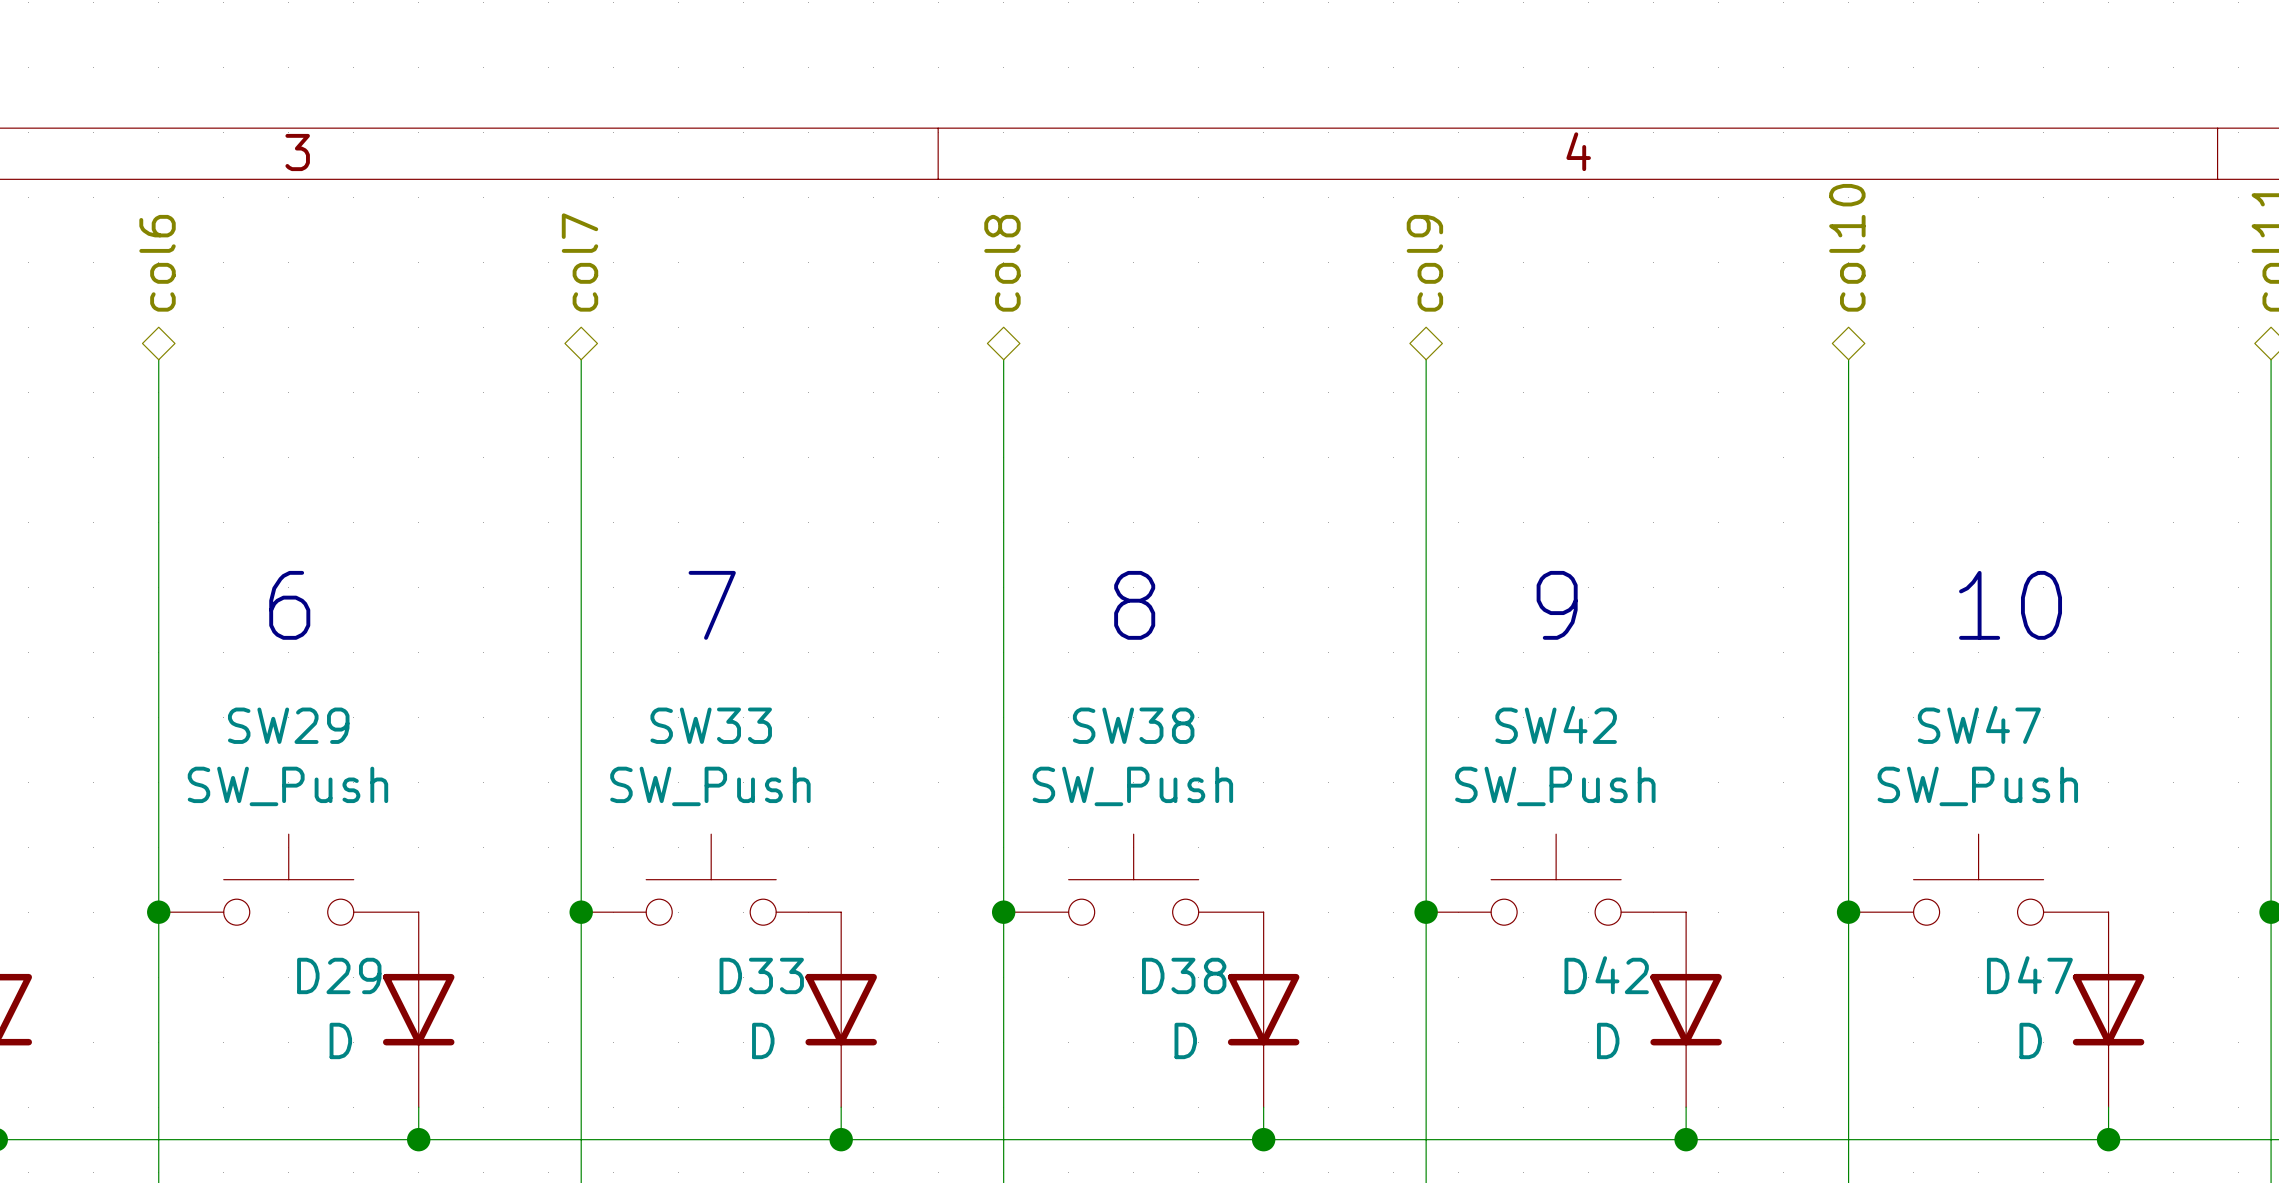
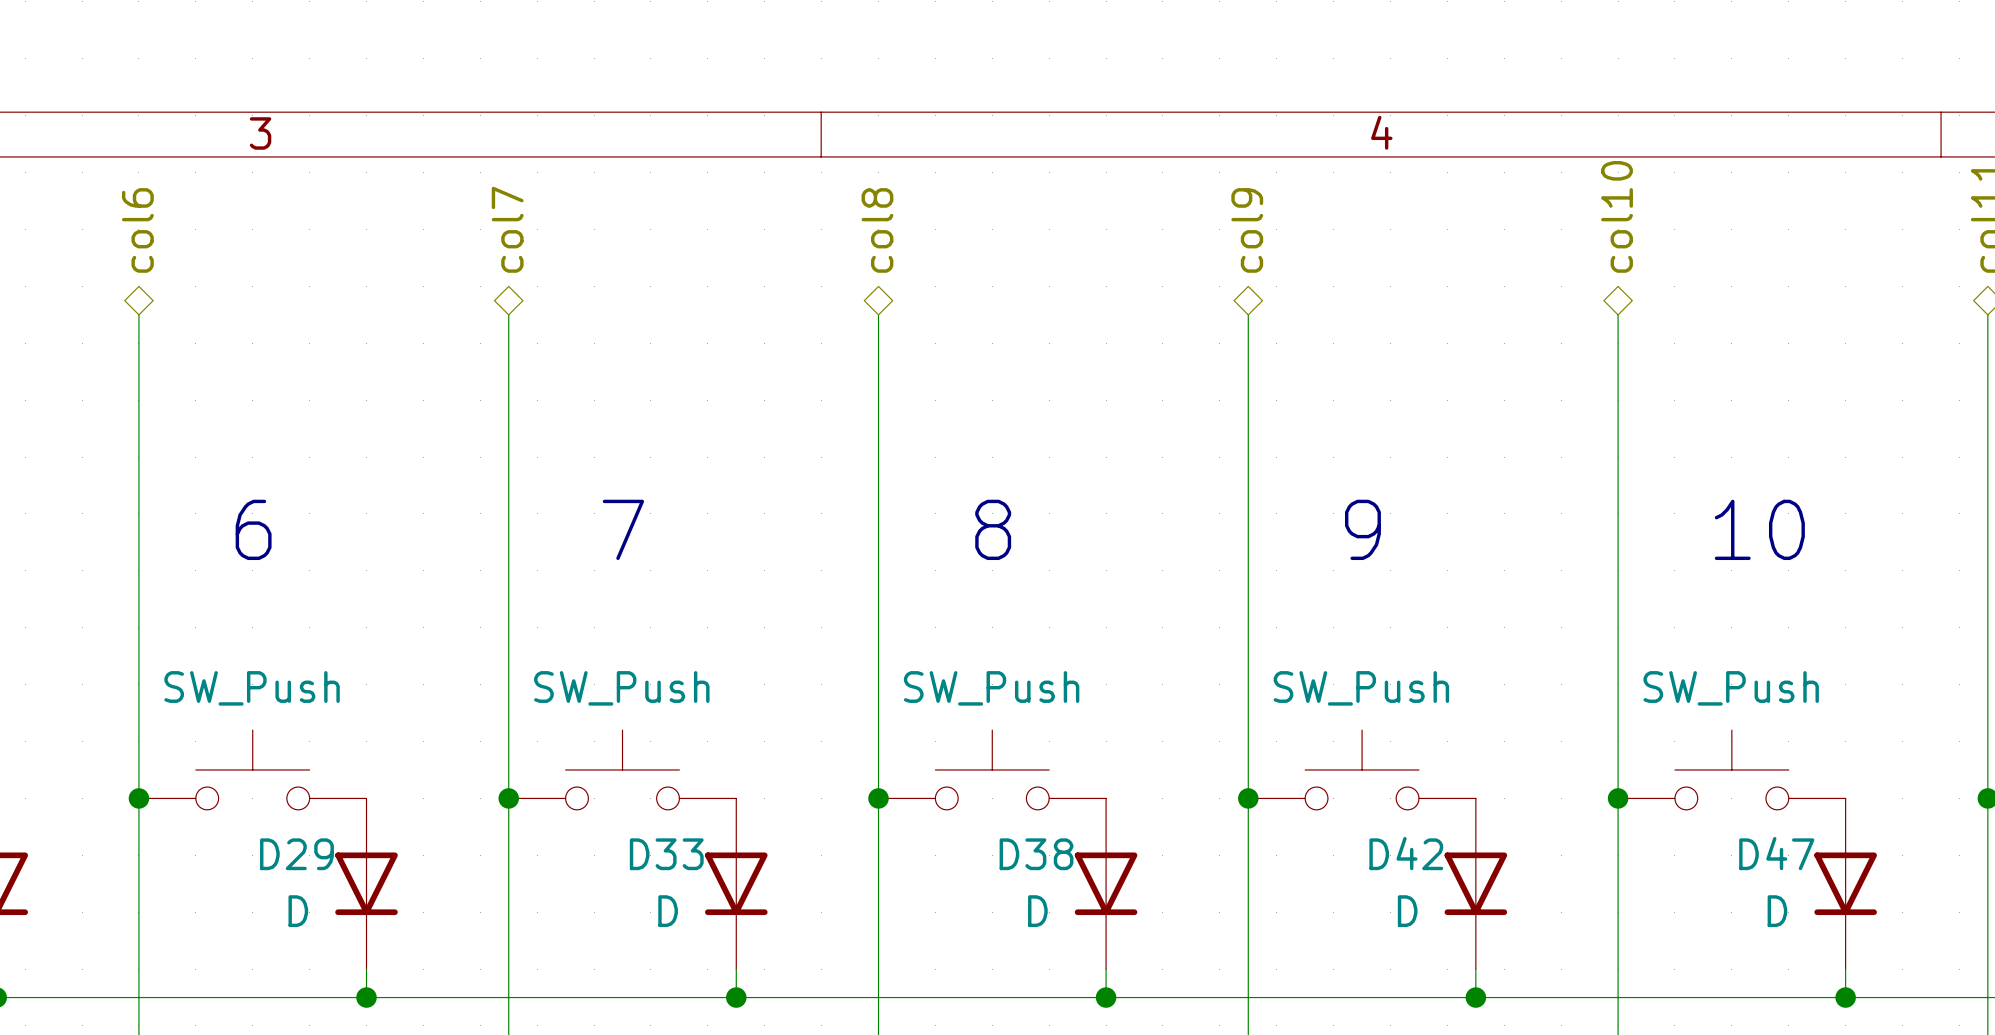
SW42 name: SW42 (1556, 724) -> none
SW47 name: SW47 (1979, 724) -> none
SW29 name: SW29 (288, 725) -> none
SW33 name: SW33 (711, 725) -> none
SW38 name: SW38 (1133, 725) -> none

